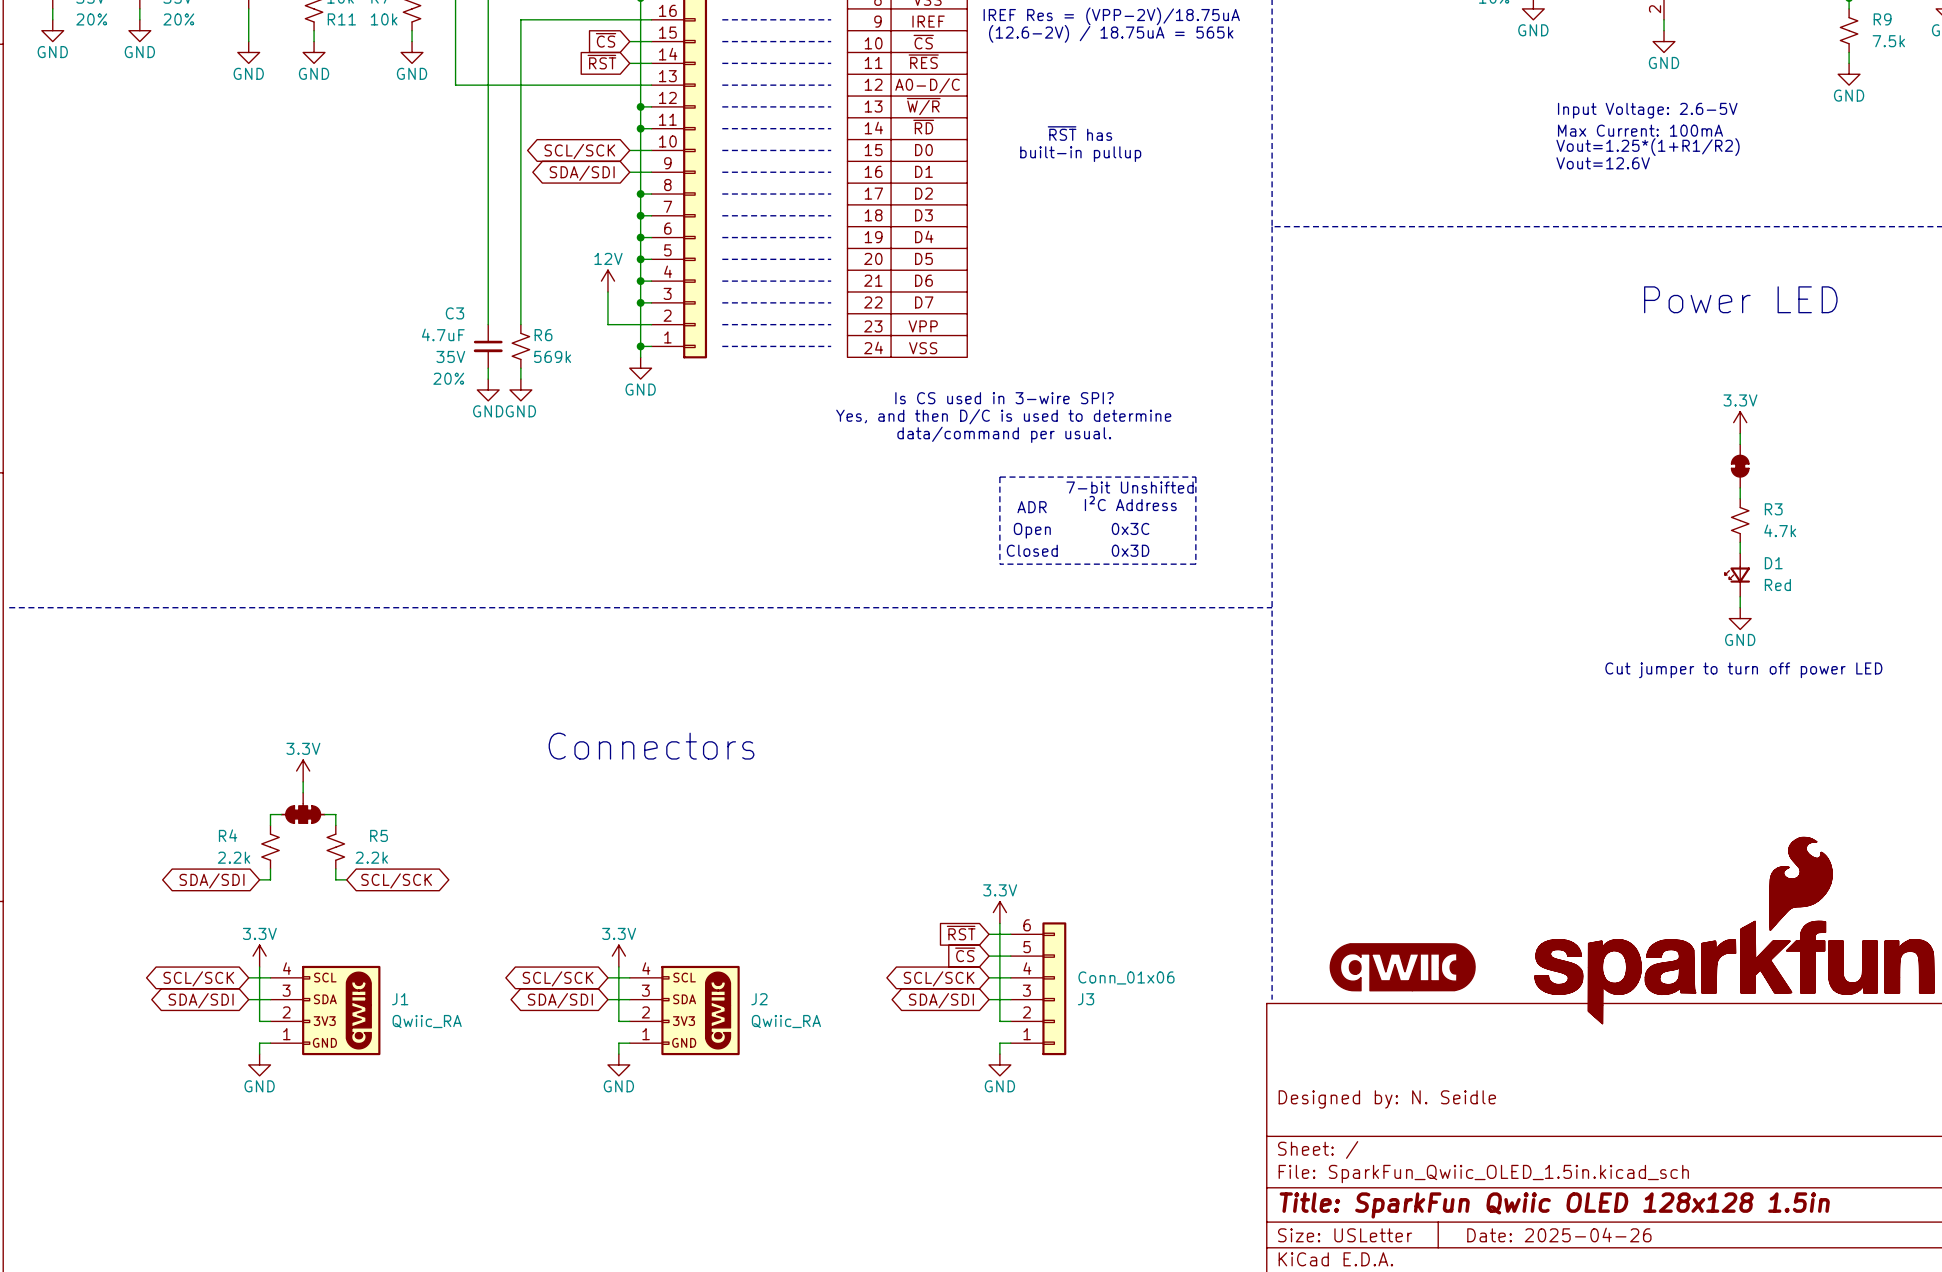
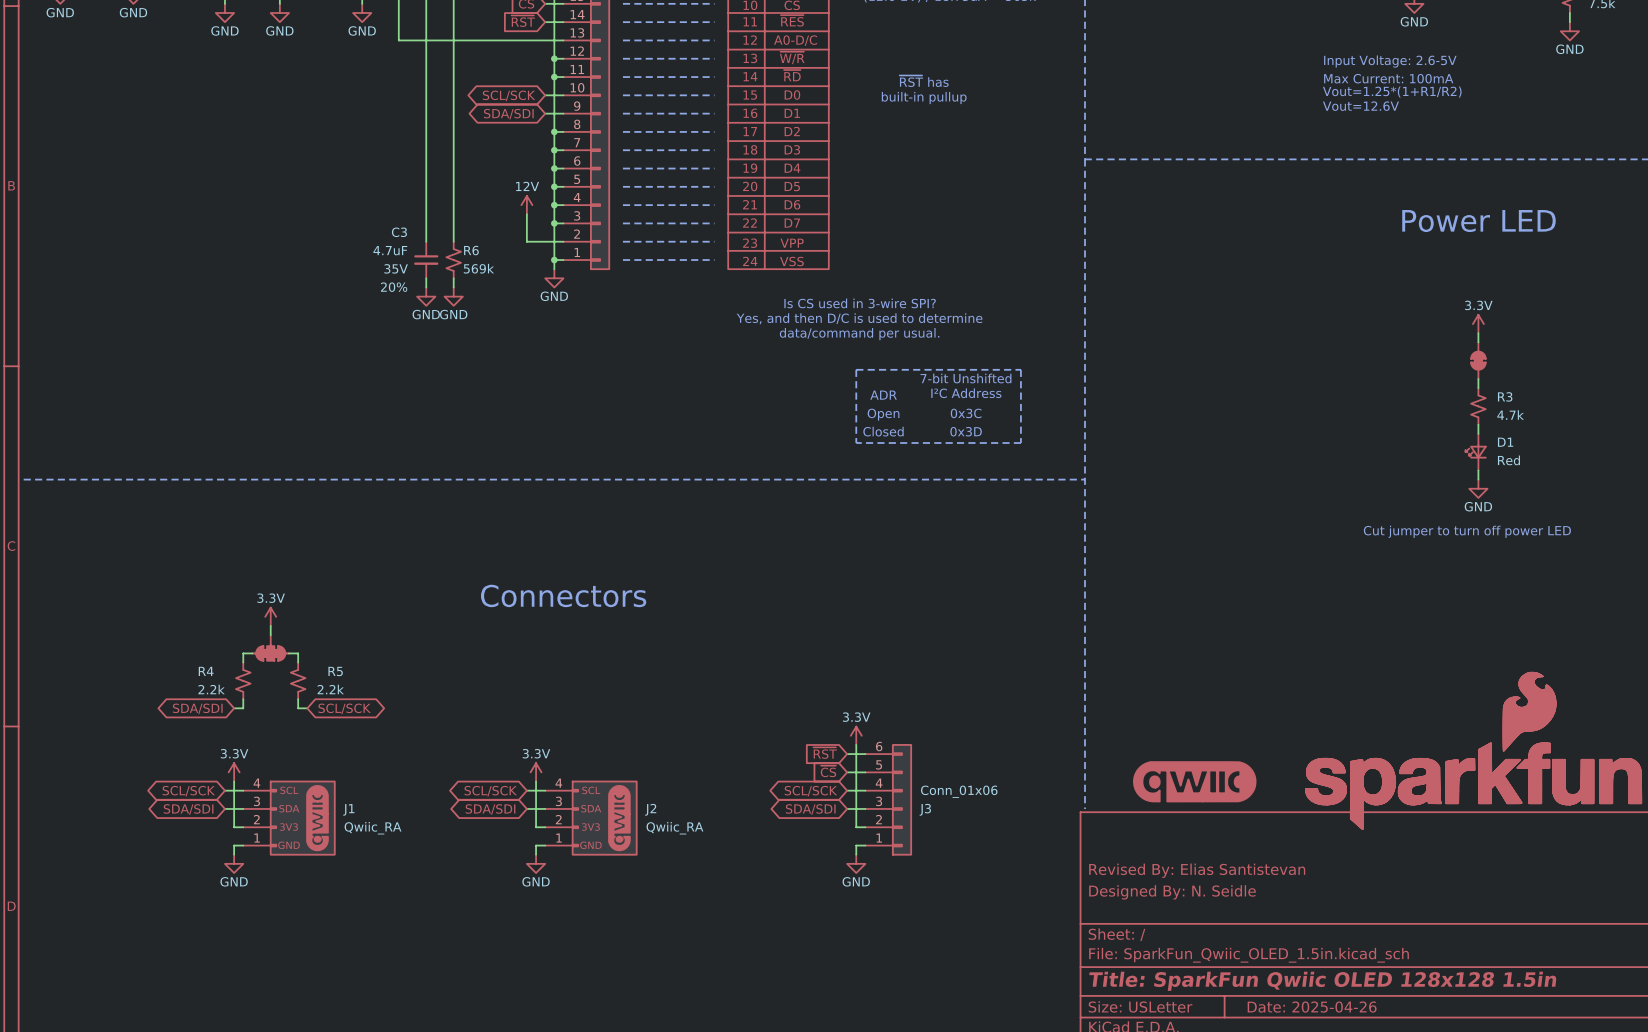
title block: none -> Revised By: Elias Santistevan (1197, 870)
title block: Designed by: N. Seidle (1387, 1099) -> Designed By: N. Seidle (1172, 892)

